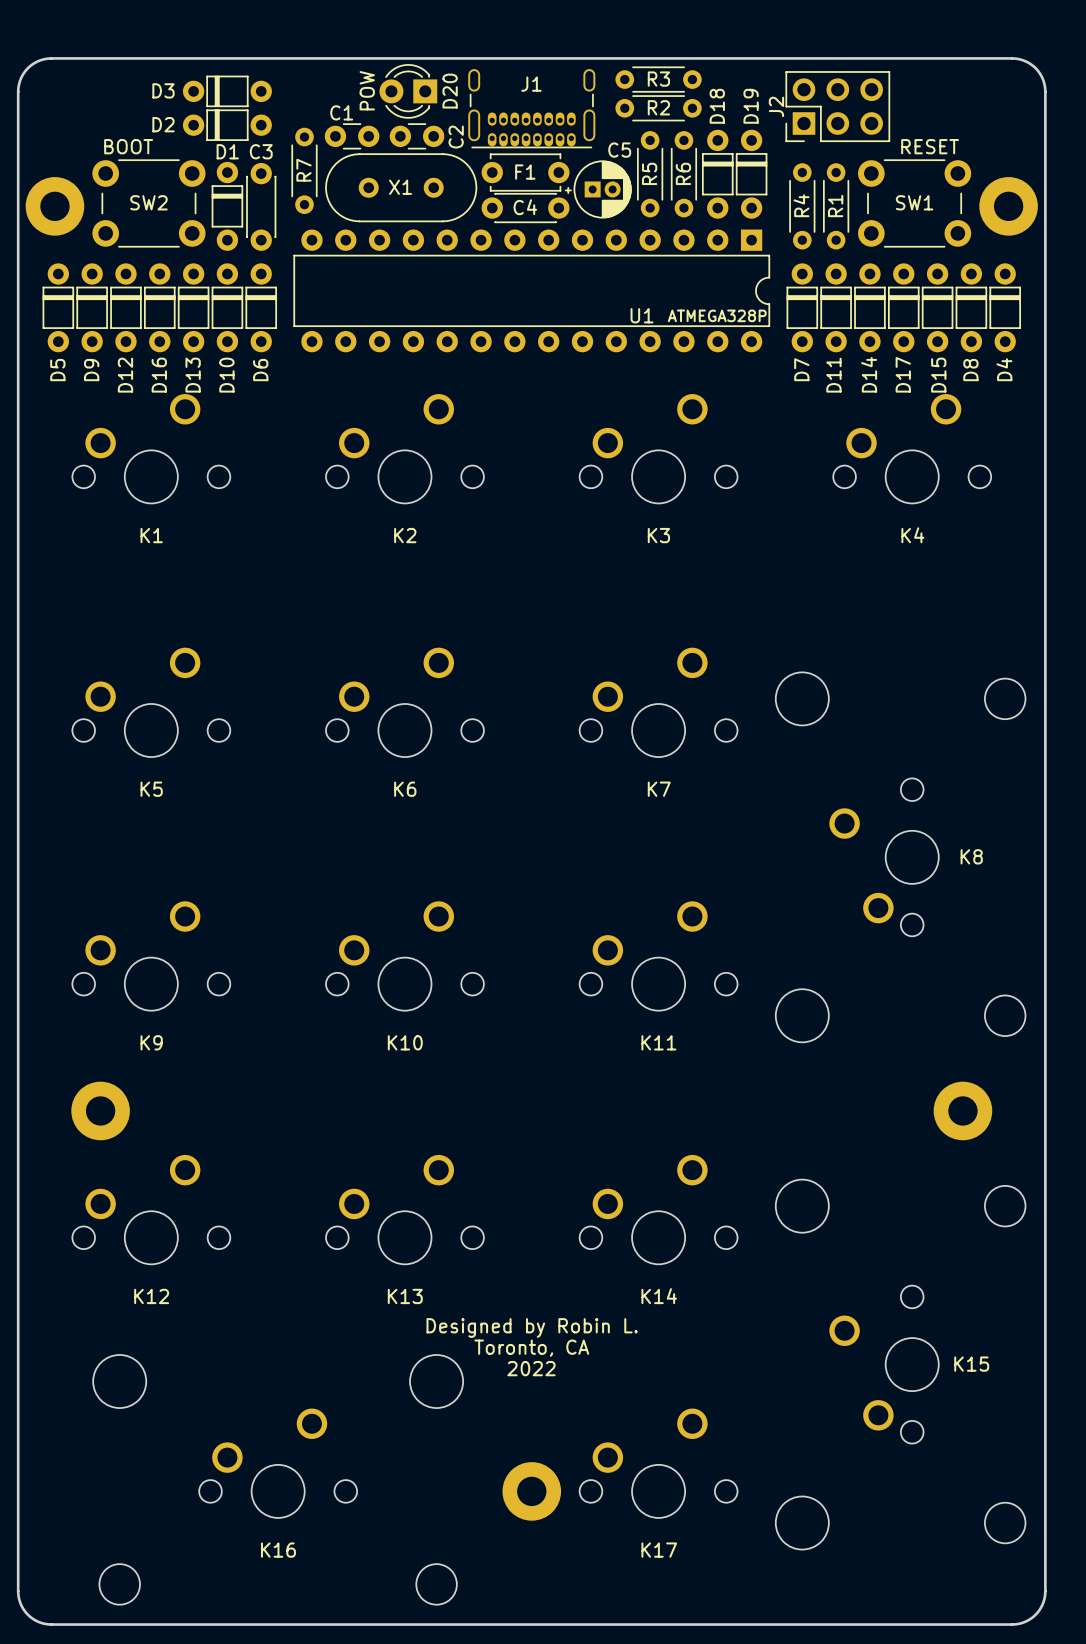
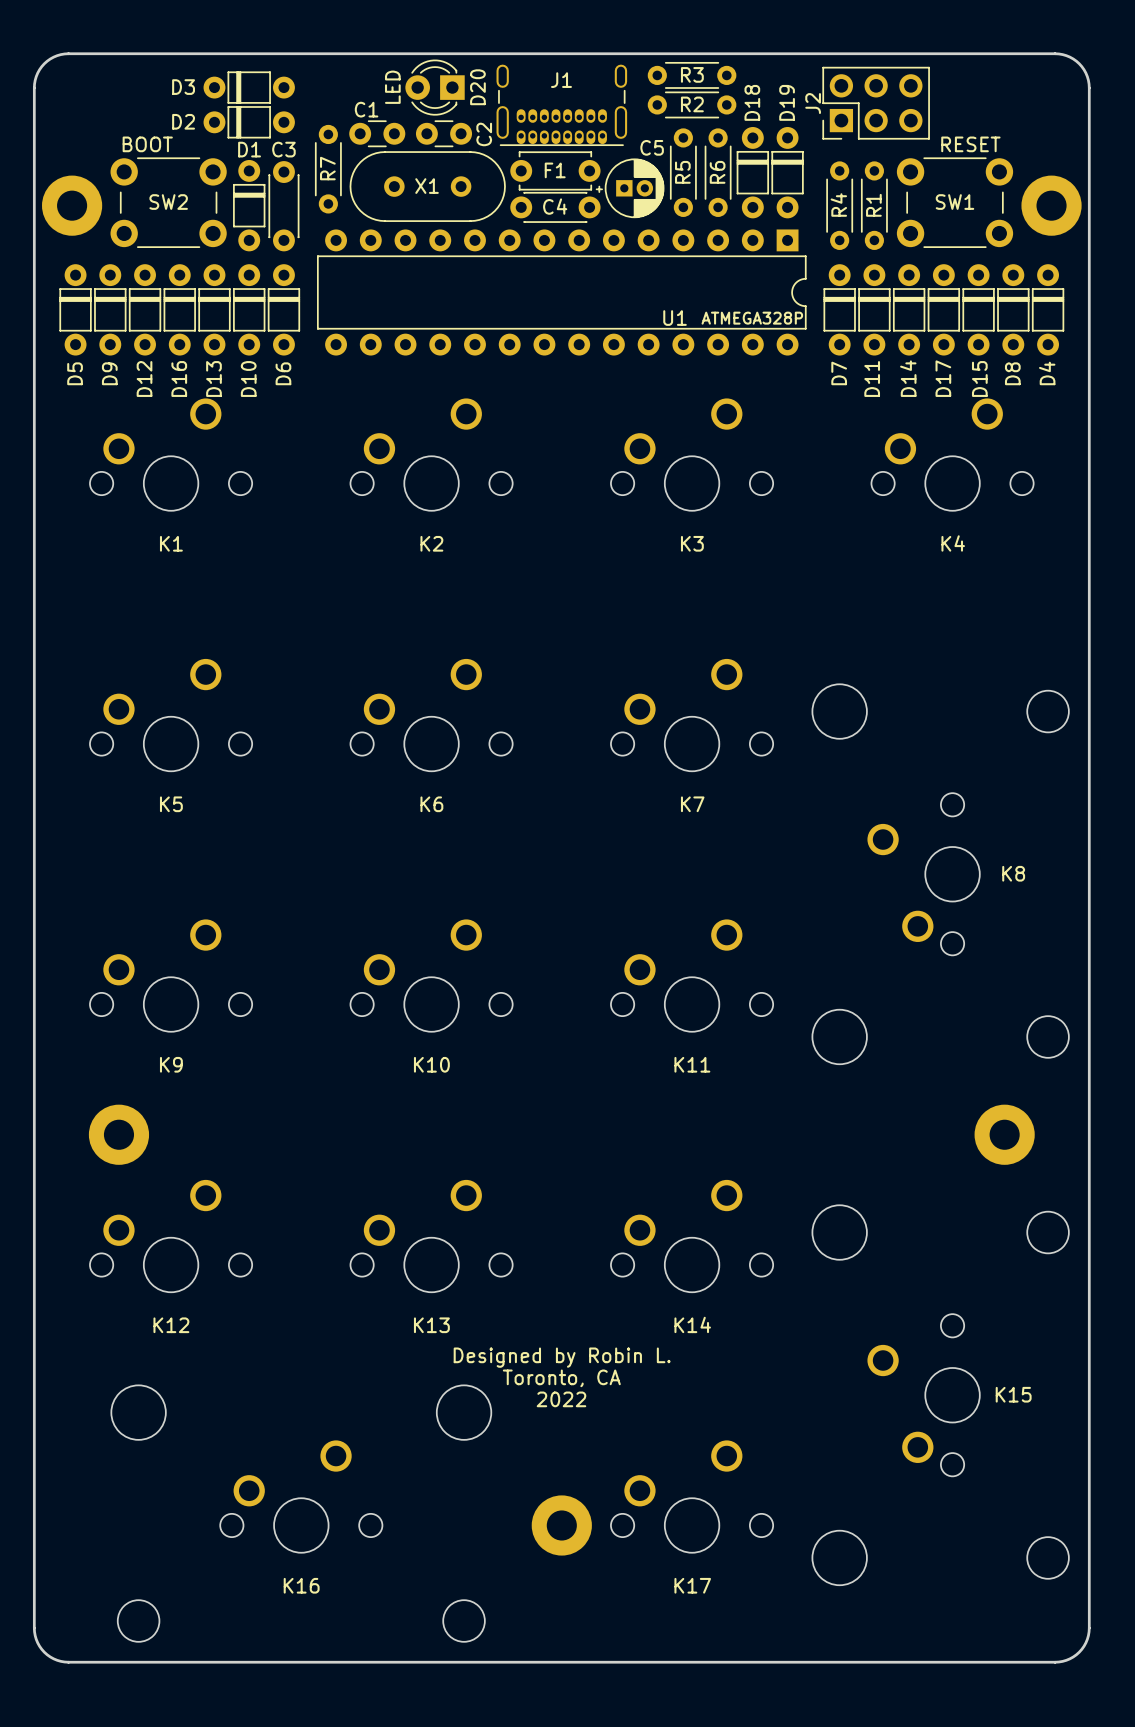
D20 value: POW (367, 90) -> LED (392, 87)

